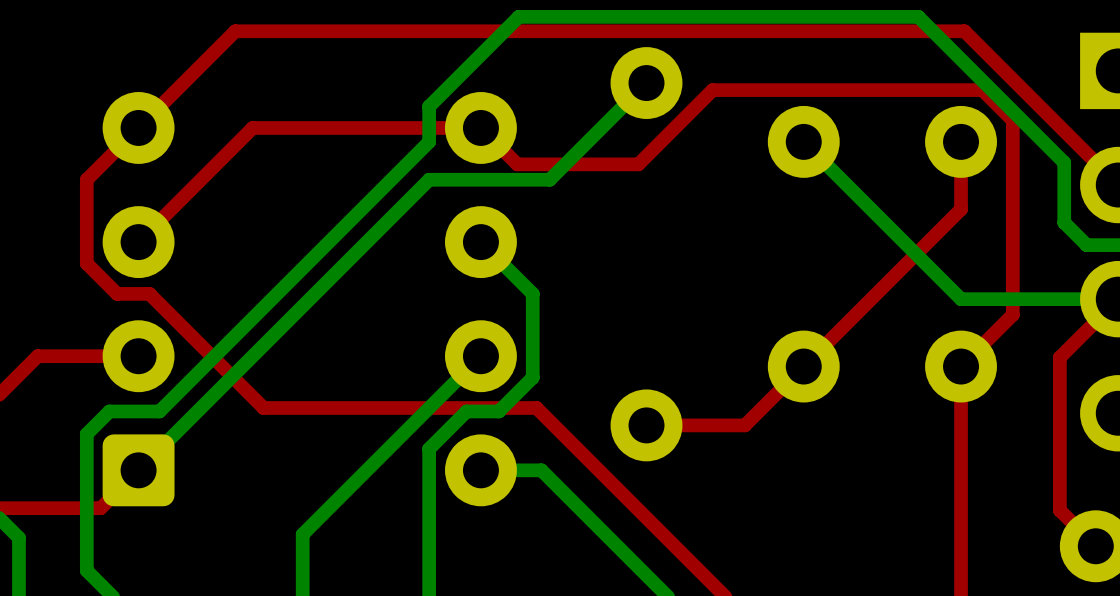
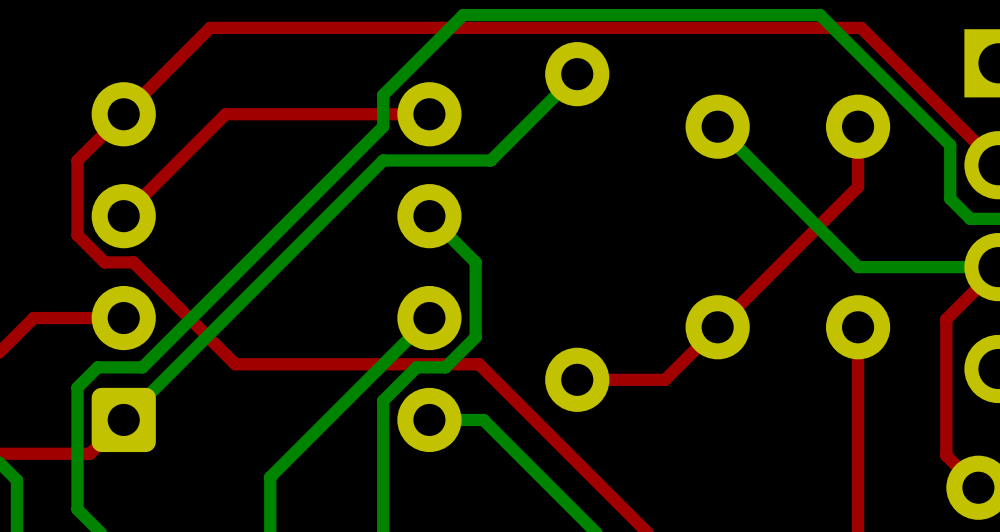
top track: (480, 127) (517, 164) (638, 164) (712, 90) (982, 90) (1012, 120) (1012, 314) (961, 366) -> none

